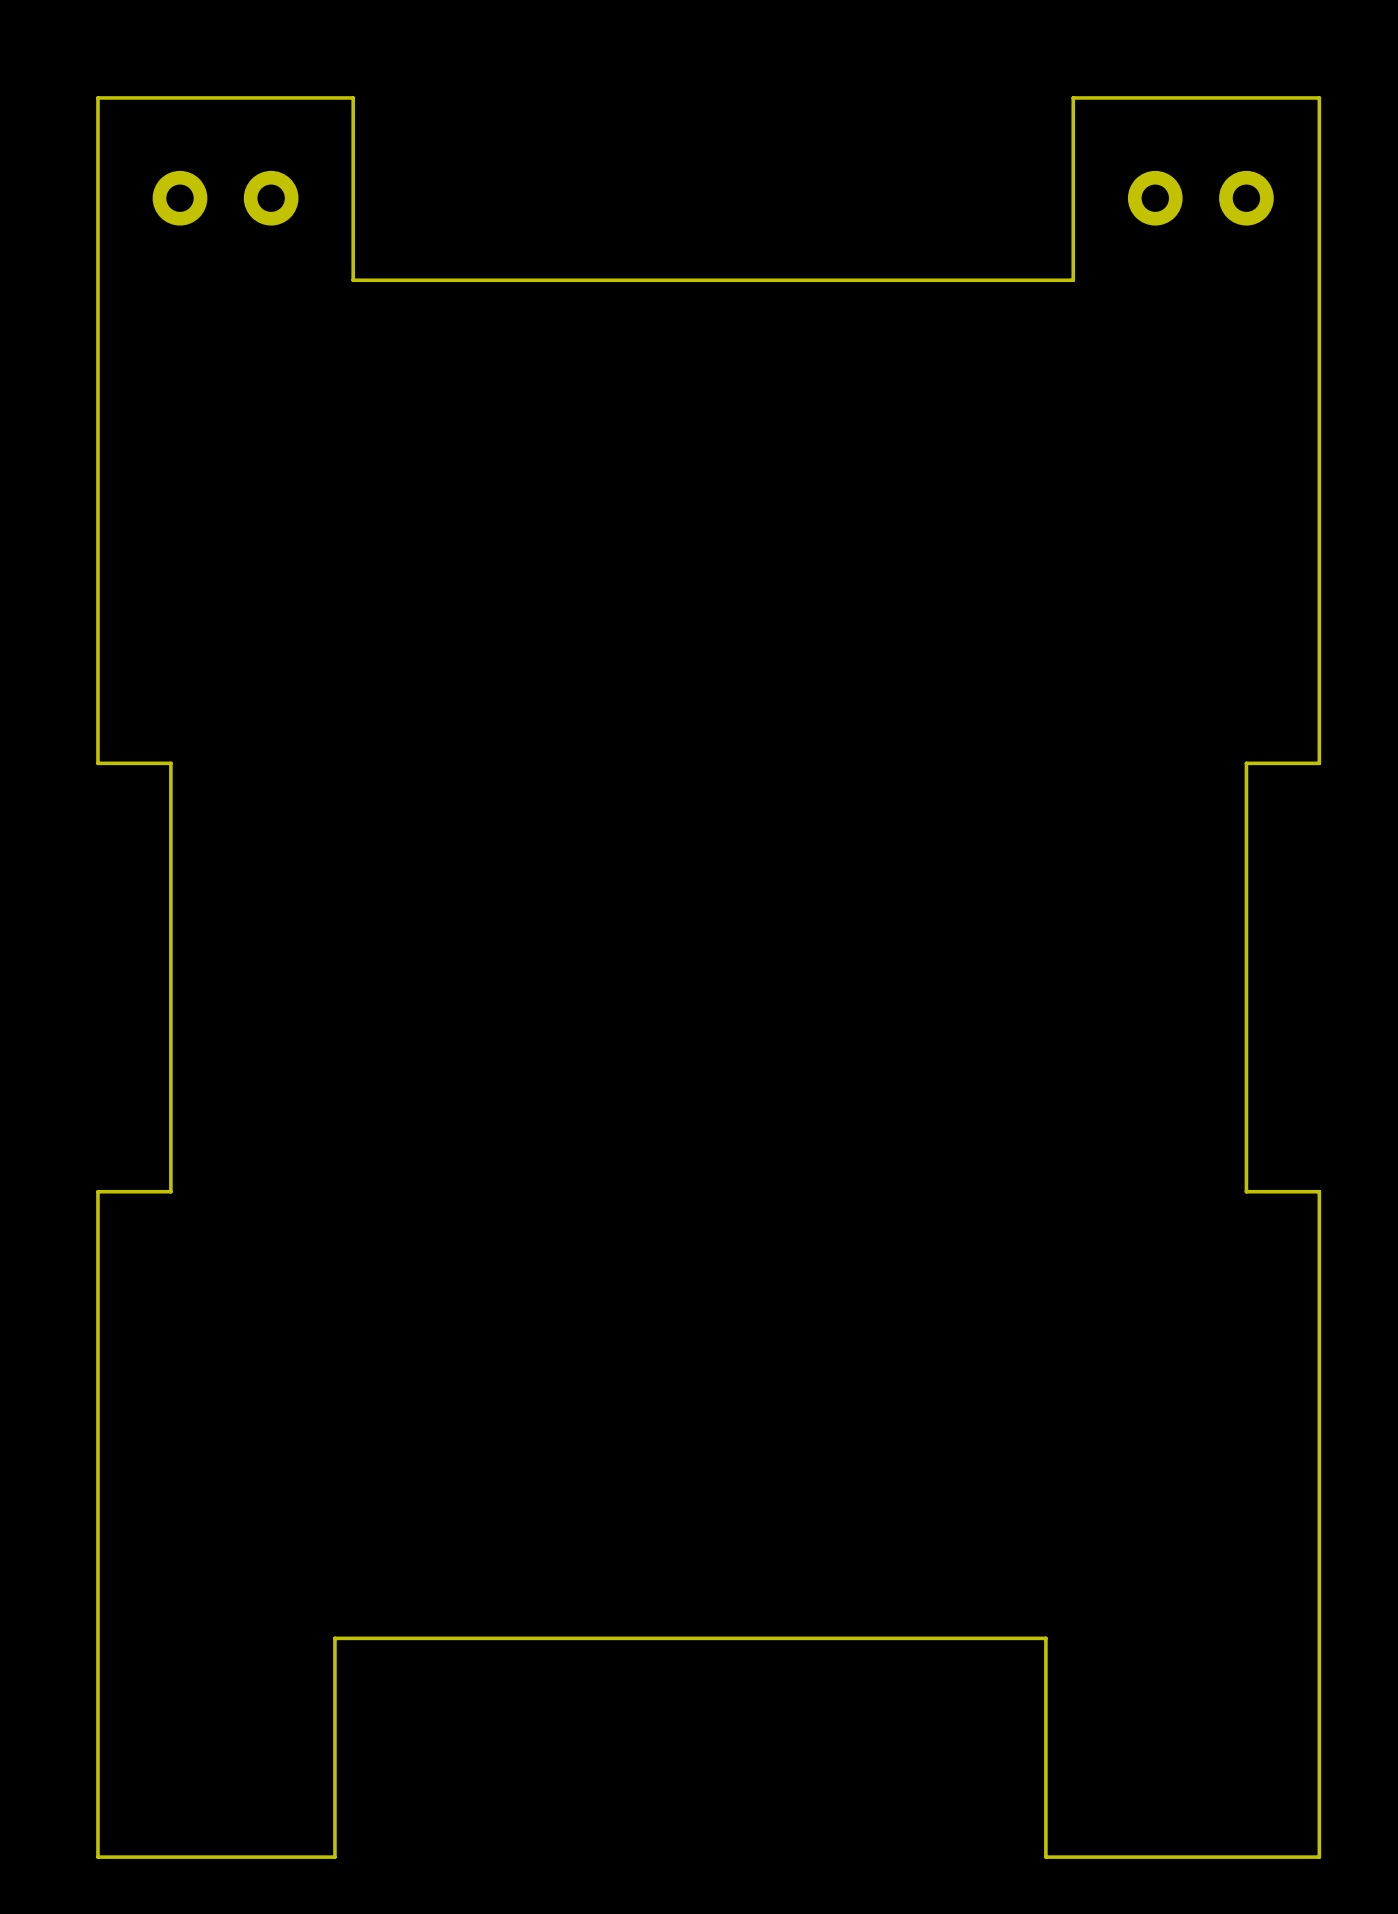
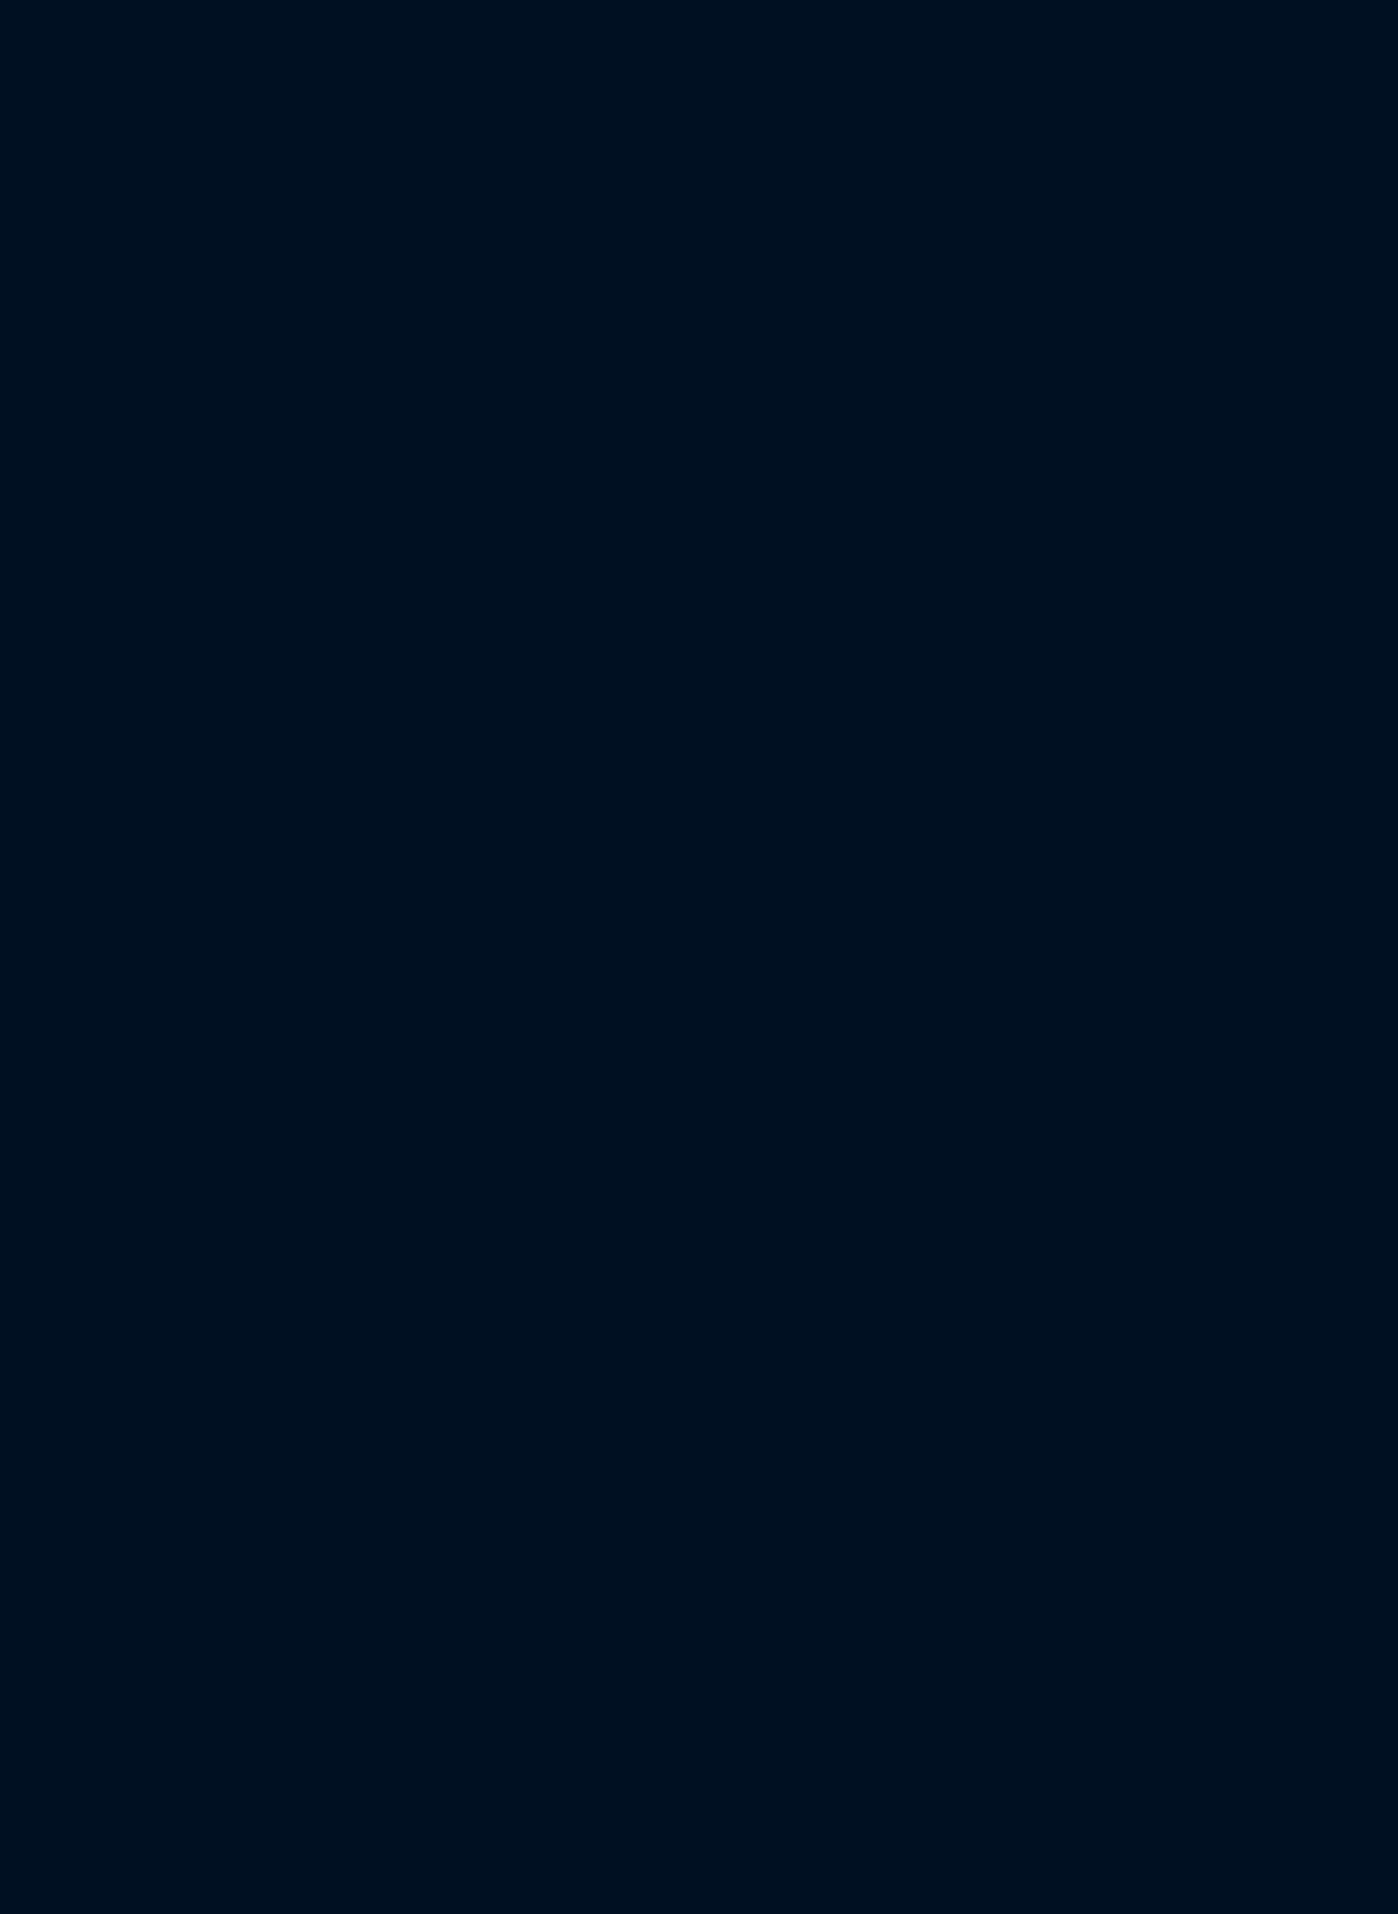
board edge: (1319, 97) (1319, 763) (1246, 763) (1246, 1191) (1319, 1191) (1319, 1857) (1045, 1857) (1045, 1638) (334, 1638) (334, 1857) (97, 1857) (97, 1191) (170, 1191) (170, 763) (97, 763) (97, 97) (353, 97) (353, 280) (1073, 280) (1073, 97) (1319, 97) -> none
part: (225, 198) -> none
part: (1200, 198) -> none

